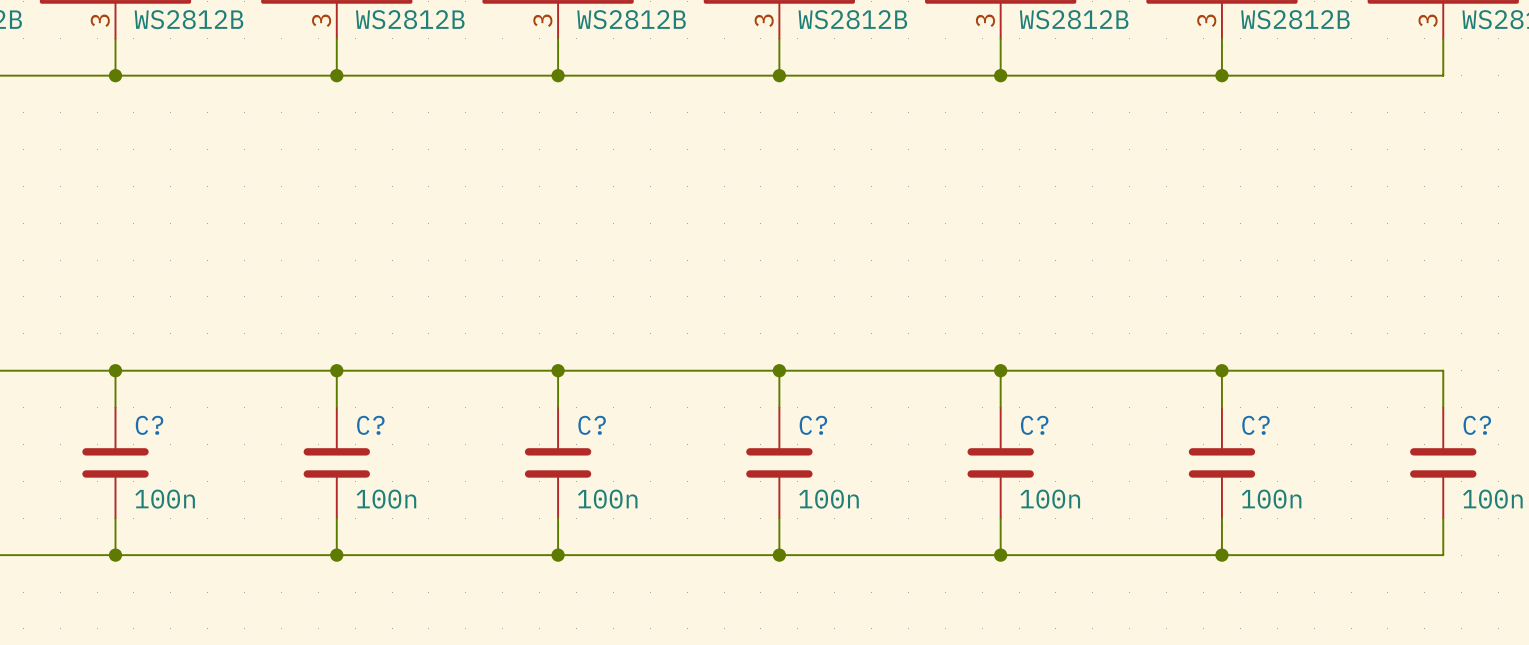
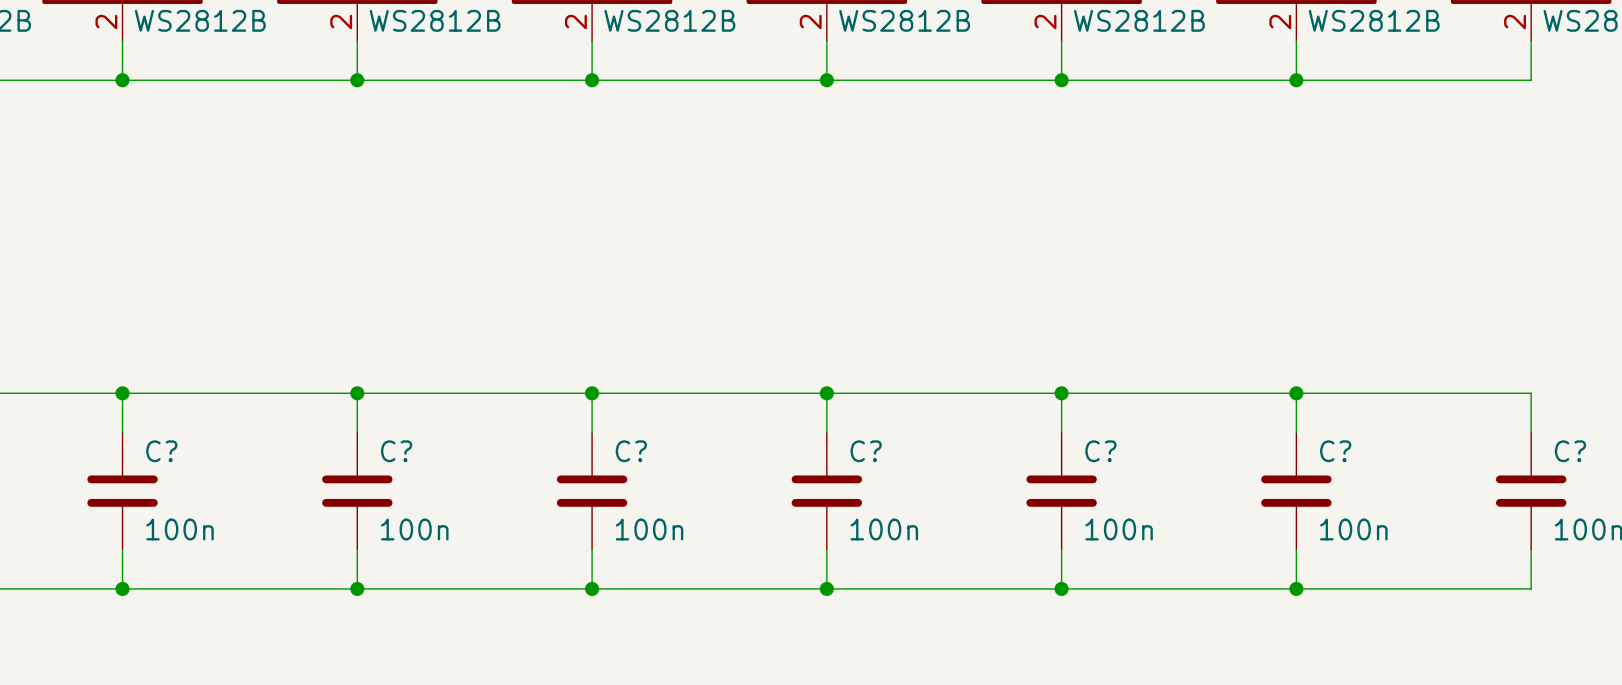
part pin number: 3 (100, 20) -> 2 (106, 22)
part pin number: 3 (321, 20) -> 2 (341, 22)
part pin number: 3 (542, 20) -> 2 (575, 22)
part pin number: 3 (764, 20) -> 2 (810, 22)
part pin number: 3 (985, 20) -> 2 (1045, 22)
part pin number: 3 (1206, 20) -> 2 (1280, 22)
part pin number: 3 (1428, 20) -> 2 (1515, 22)

